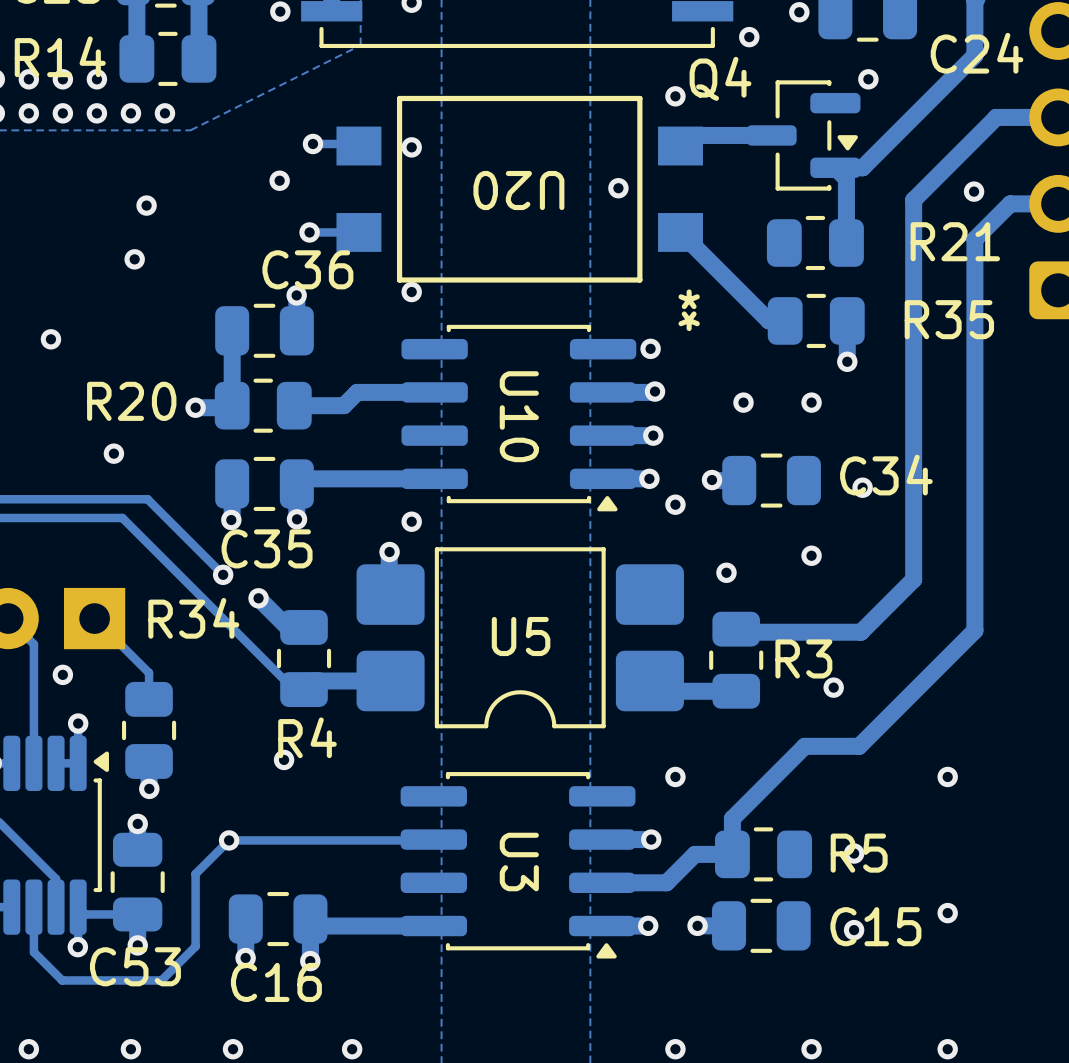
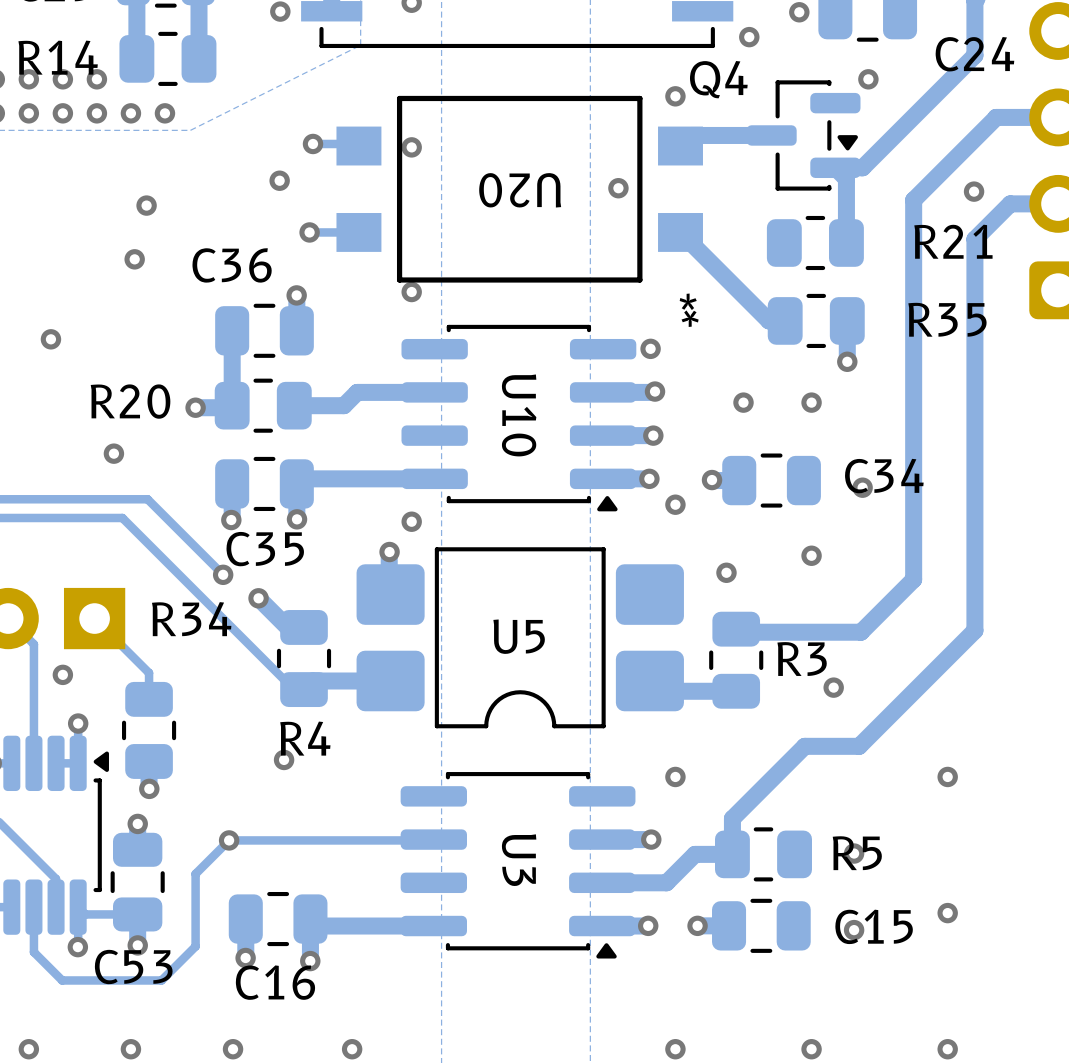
C36 name position: C36 (307, 269) -> C36 (232, 265)

